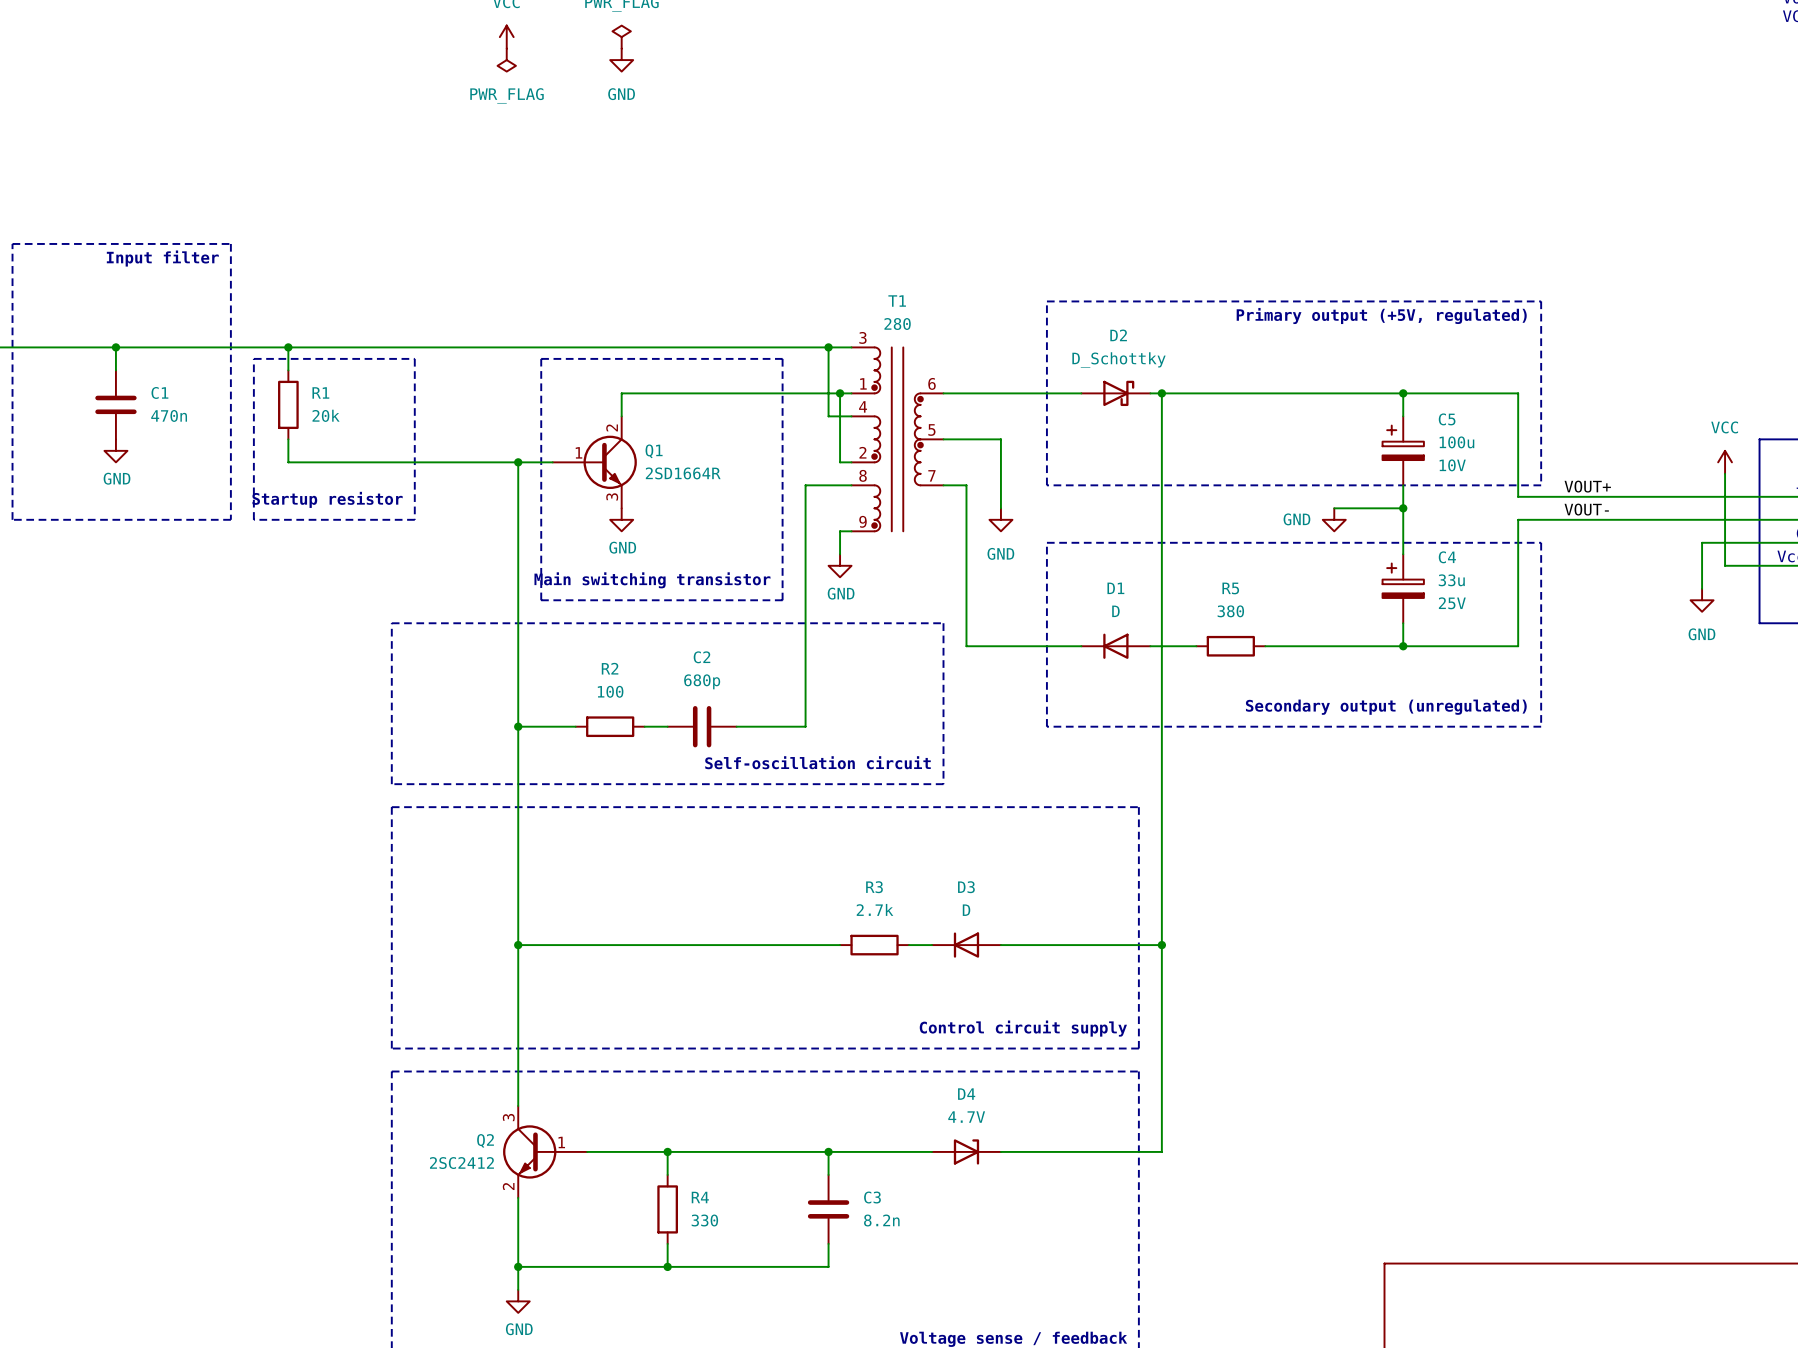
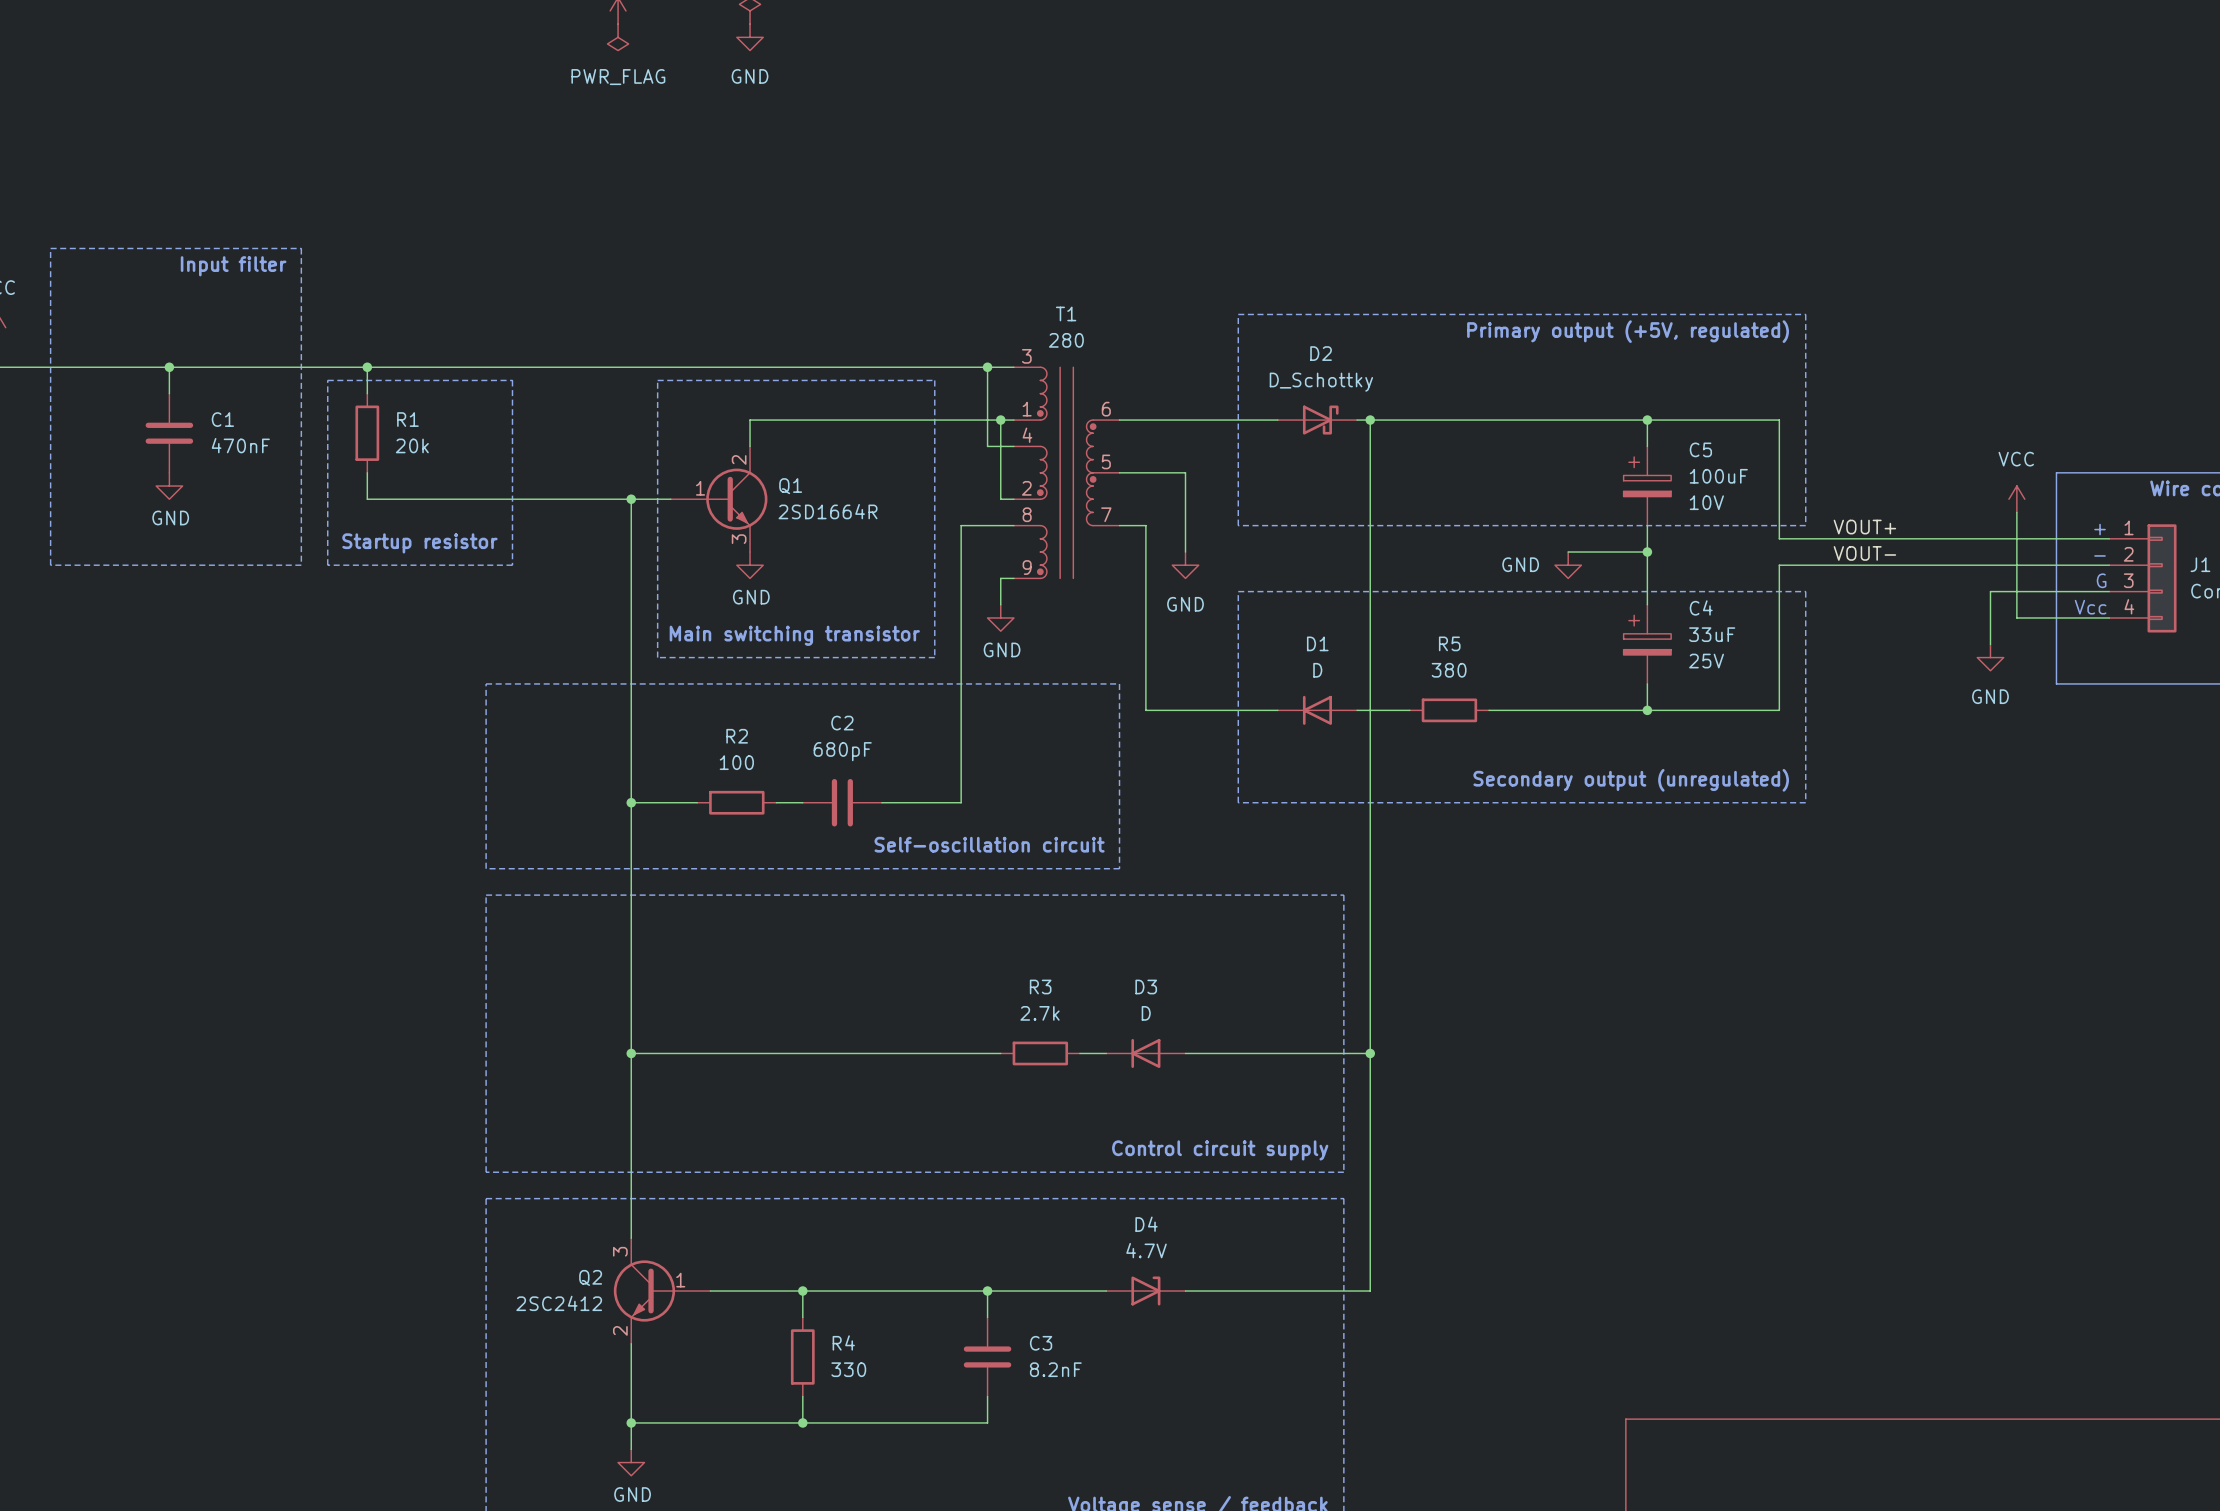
C1 value: 470n (169, 415) -> 470nF (240, 445)
C5 value: 100u (1456, 442) -> 100uF (1718, 476)
C4 value: 33u (1451, 580) -> 33uF (1712, 634)
C2 value: 680p (702, 681) -> 680pF (842, 751)
C3 value: 8.2n (881, 1220) -> 8.2nF (1055, 1369)

